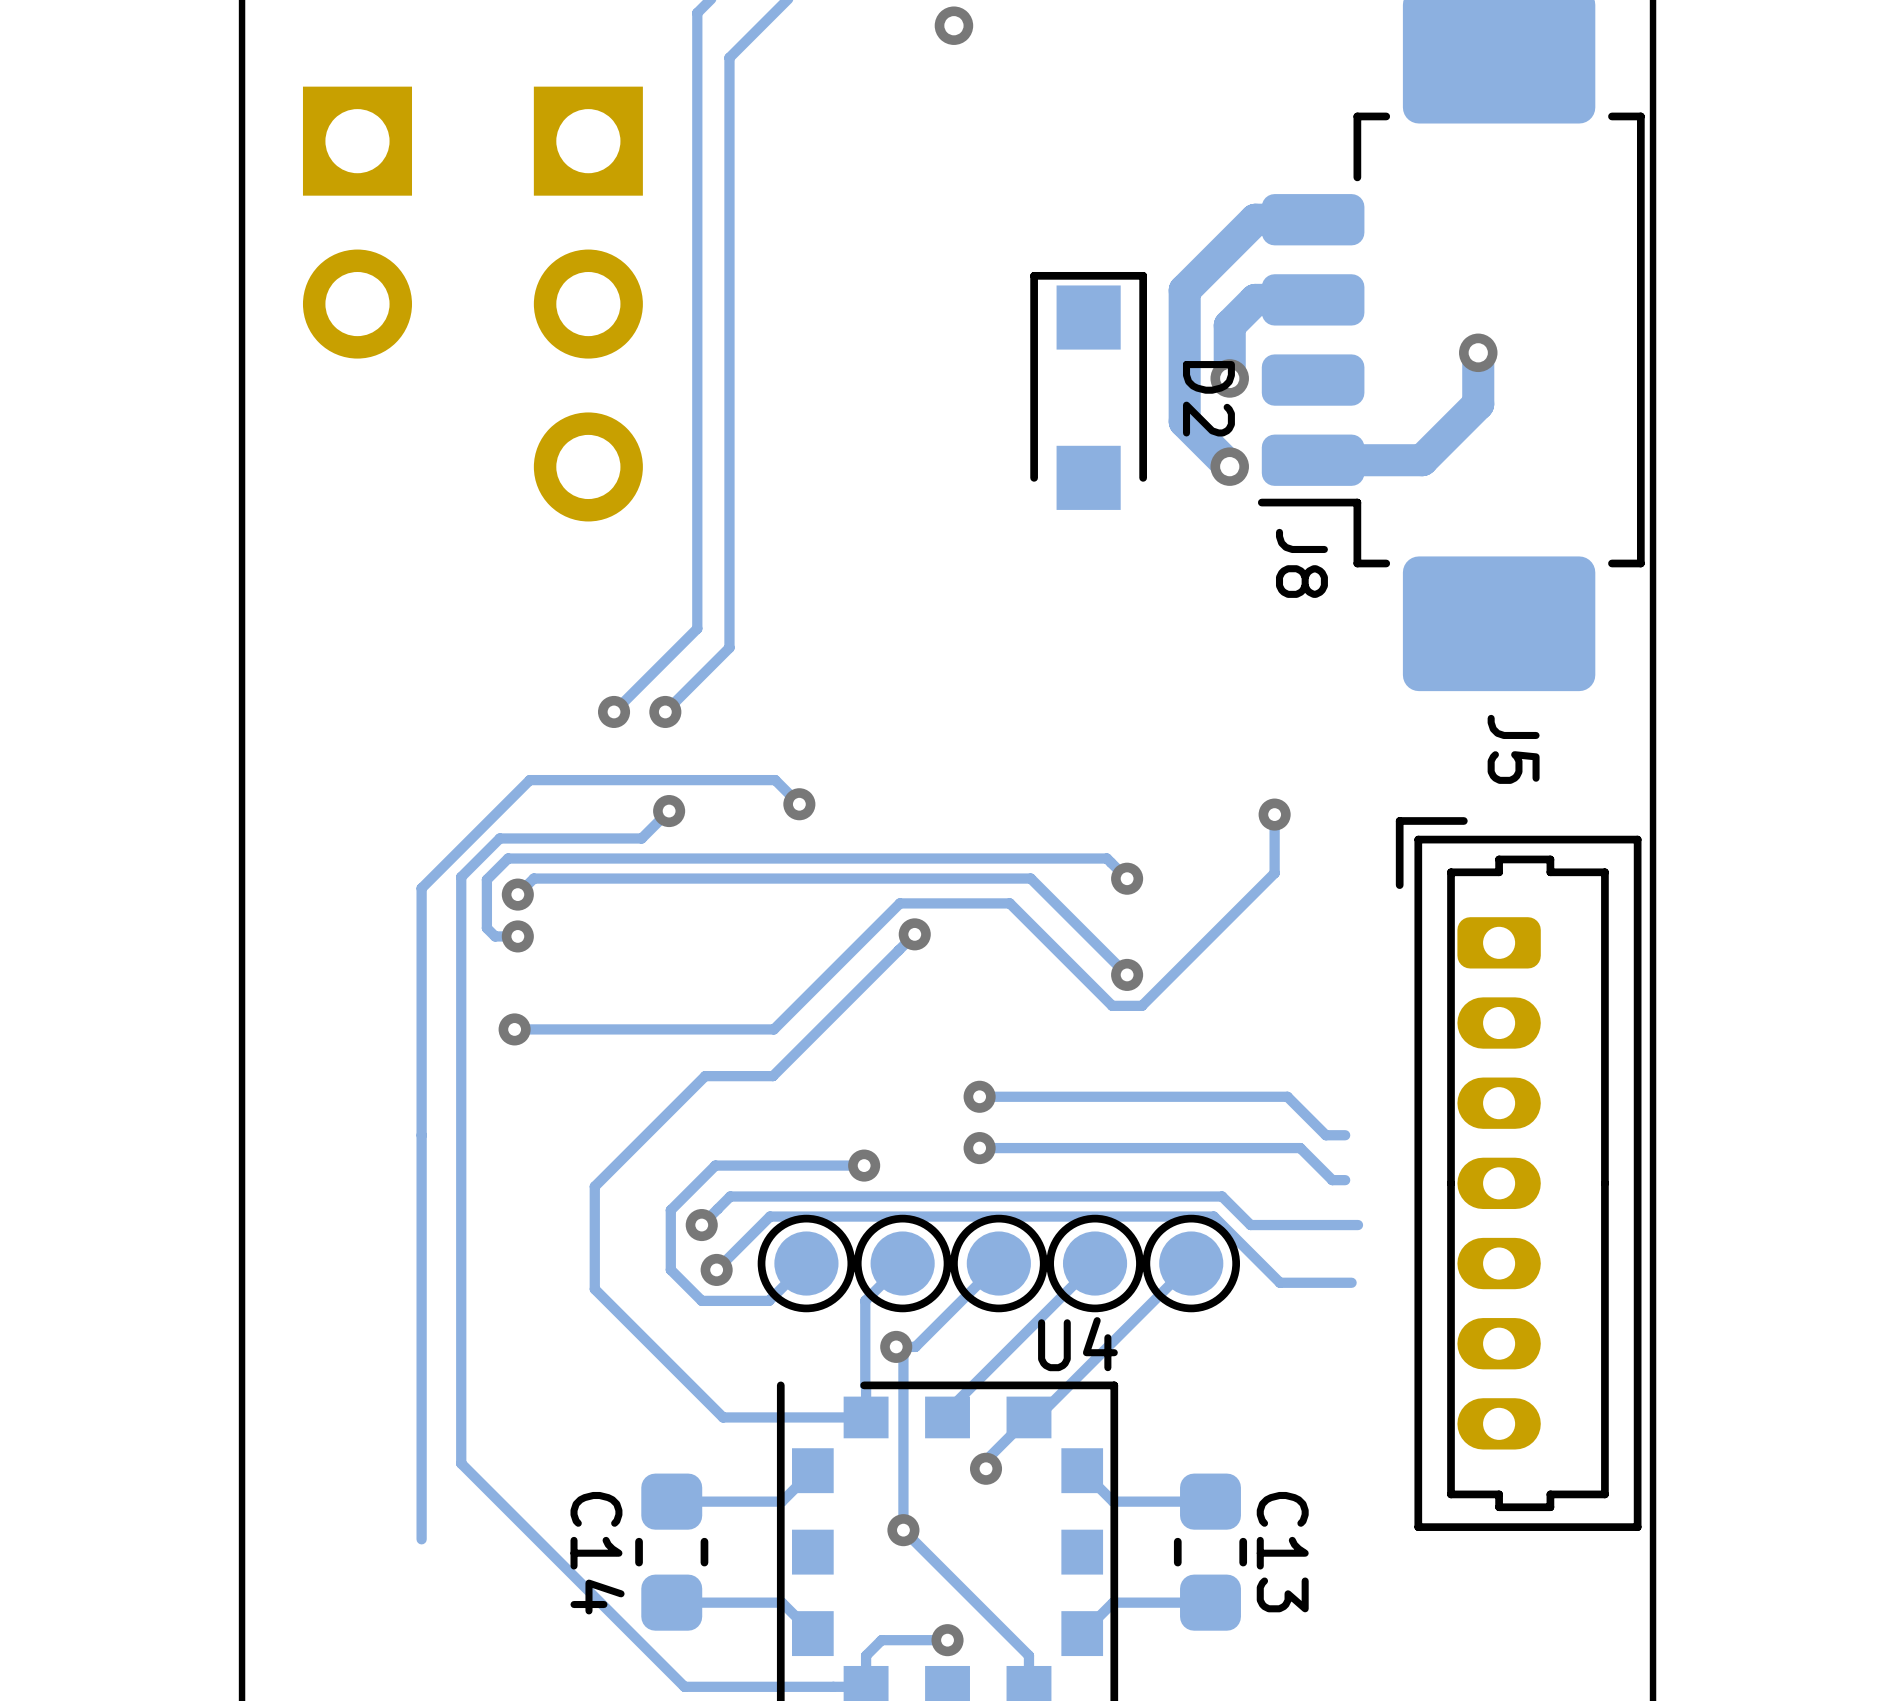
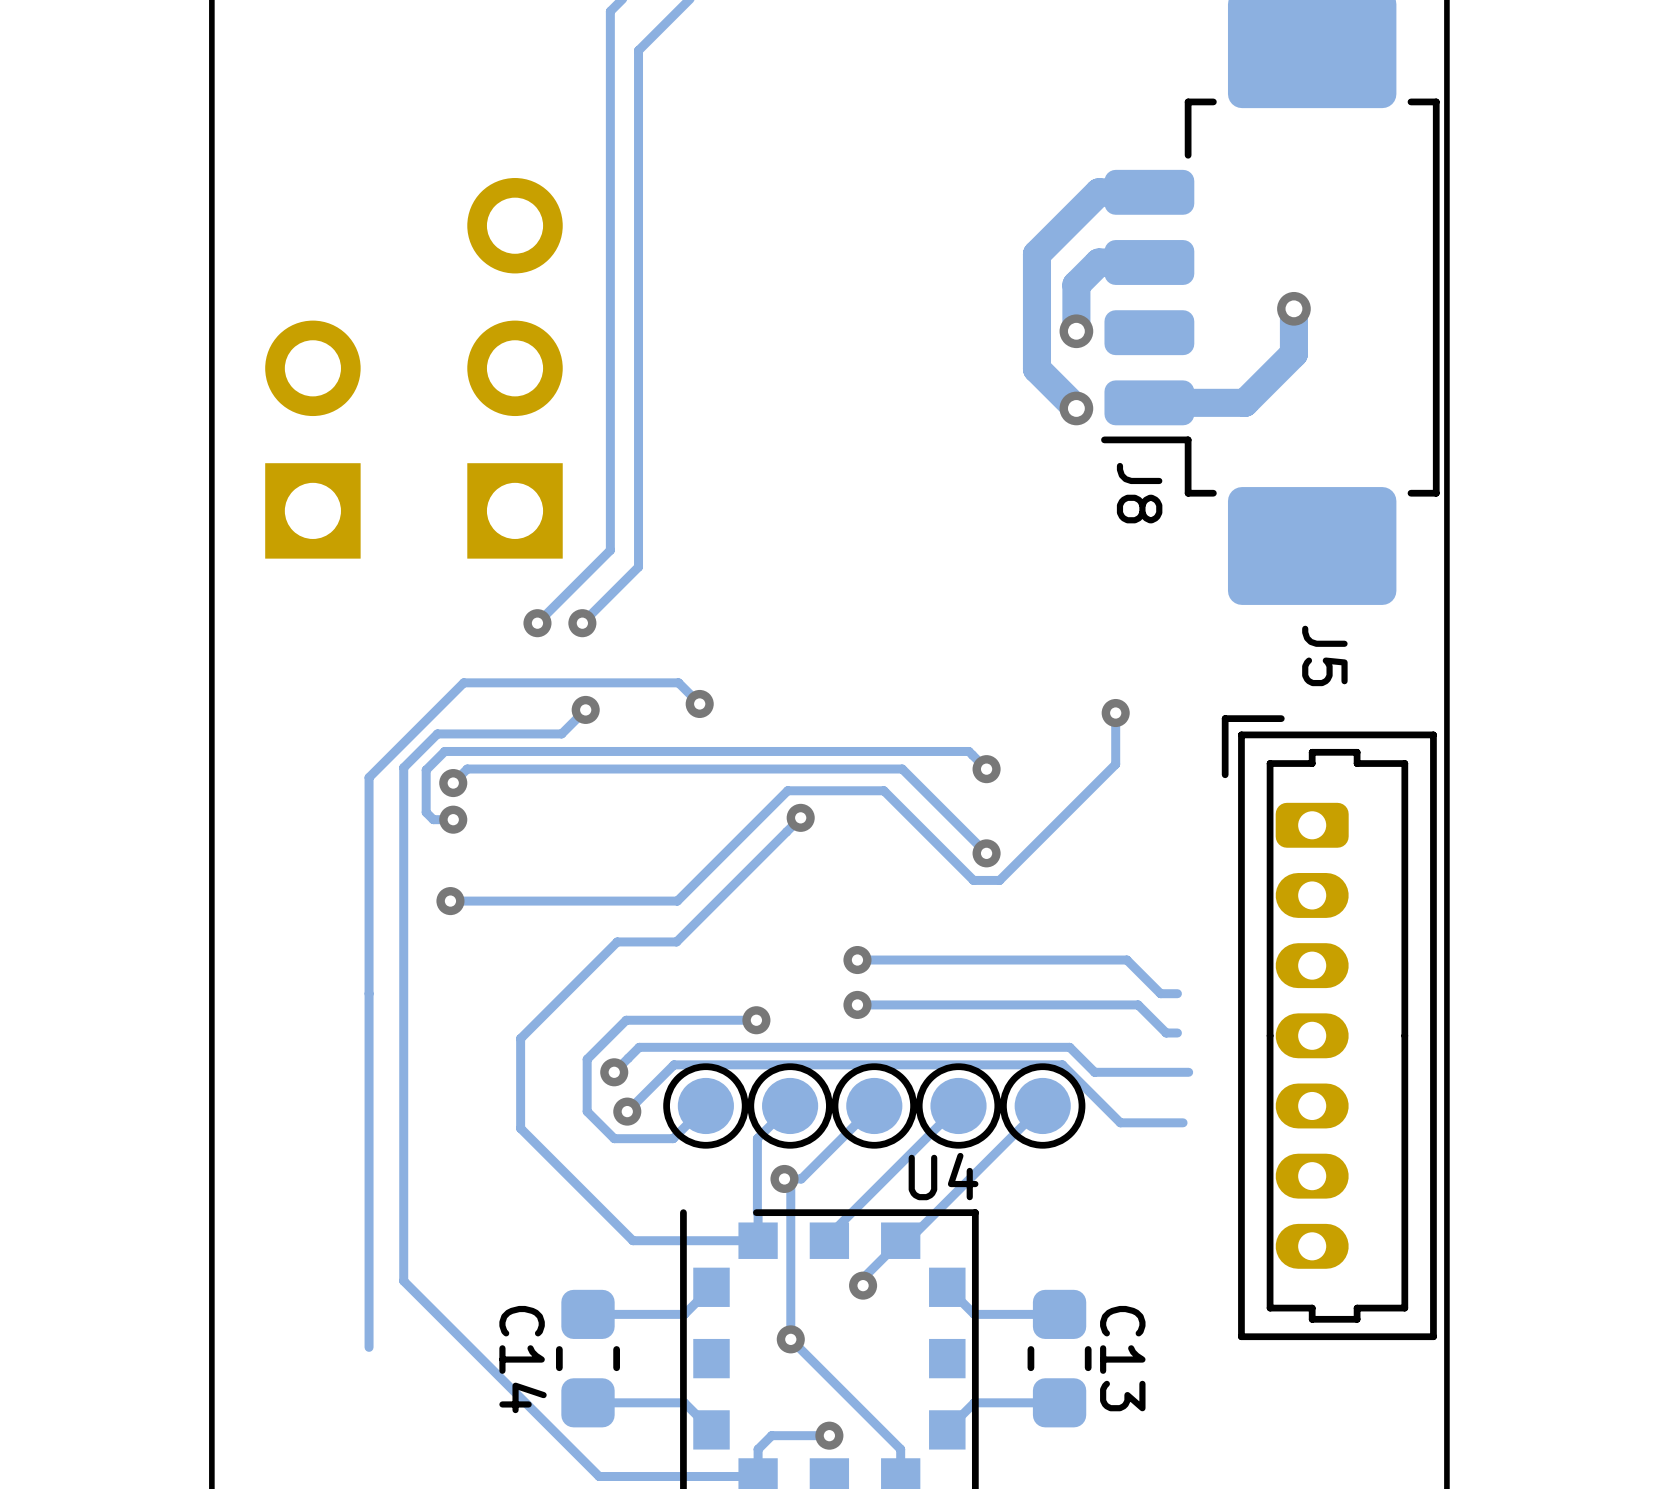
via: (953, 25) -> none
part rotation: 0° (357, 222) -> 180° (312, 439)
part position: (357, 222) -> (312, 439)
part rotation: 0° (588, 304) -> 180° (515, 368)
D2: (1088, 390) -> none

